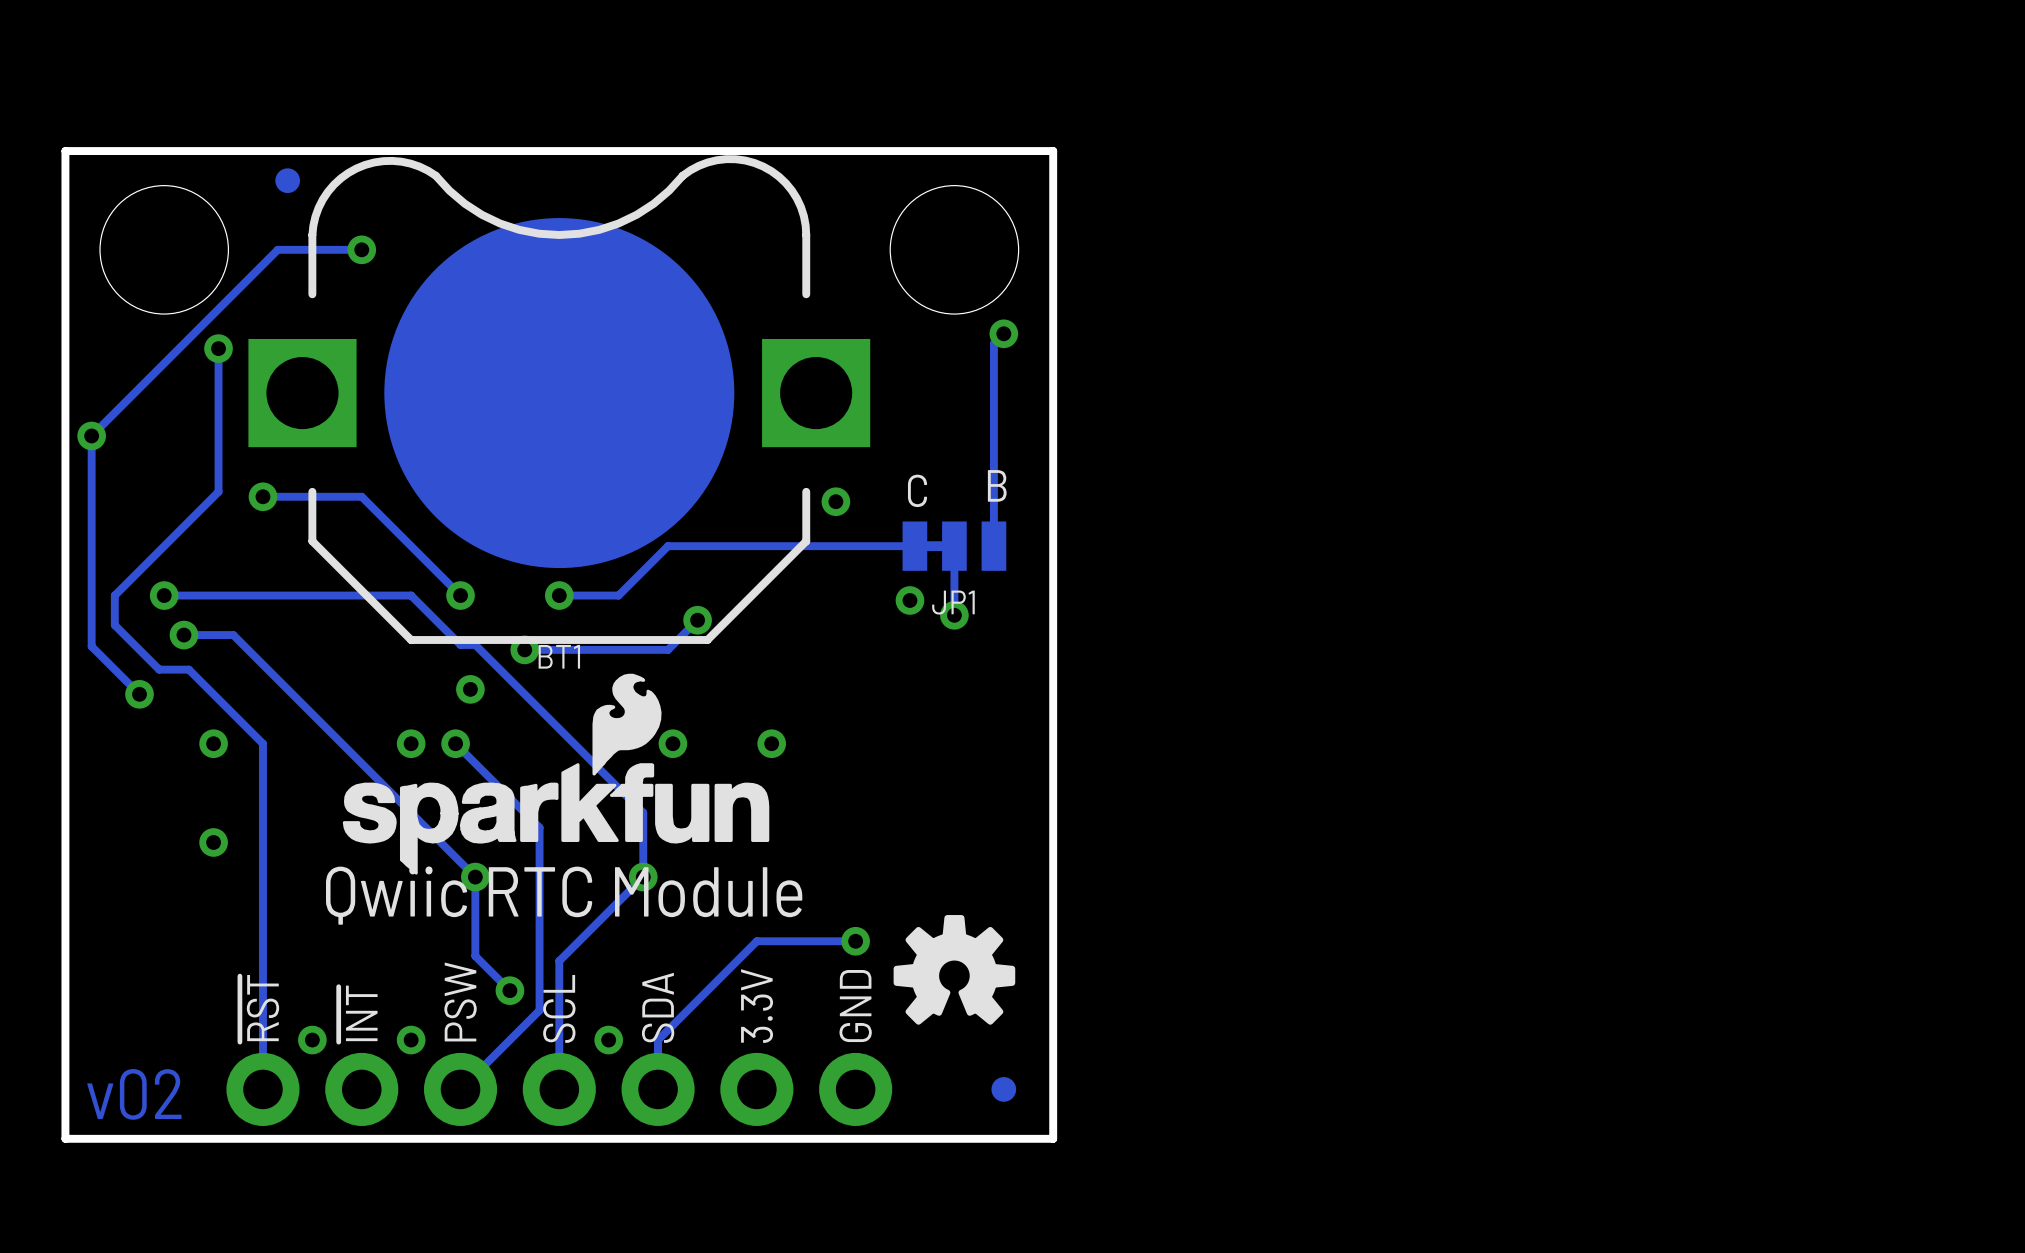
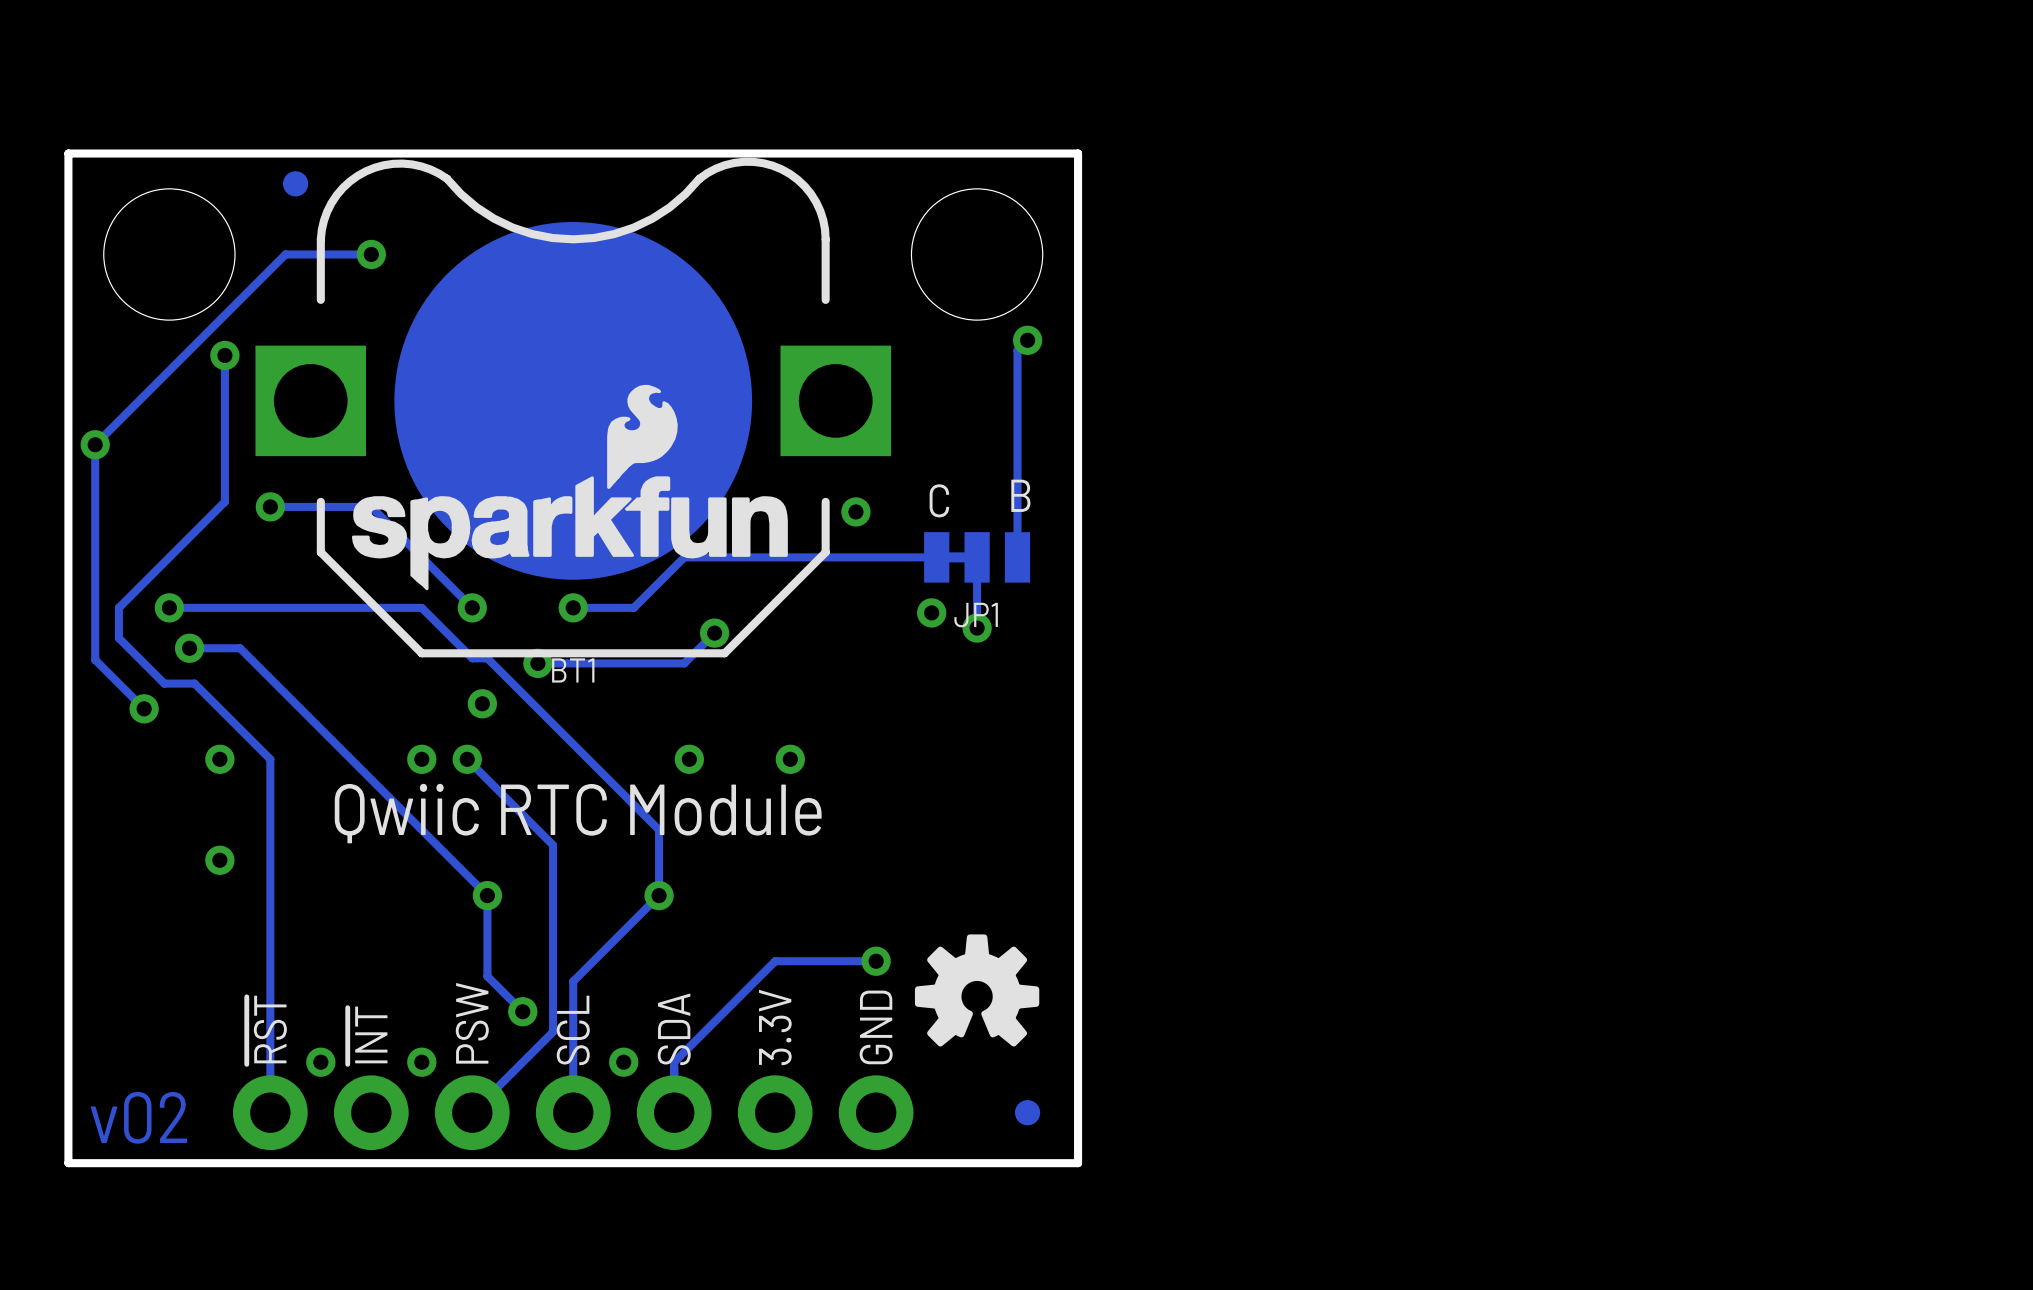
drawing position: (556, 774) -> (569, 487)
text position: Qwiic RTC Module (564, 895) -> Qwiic RTC Module (578, 813)

